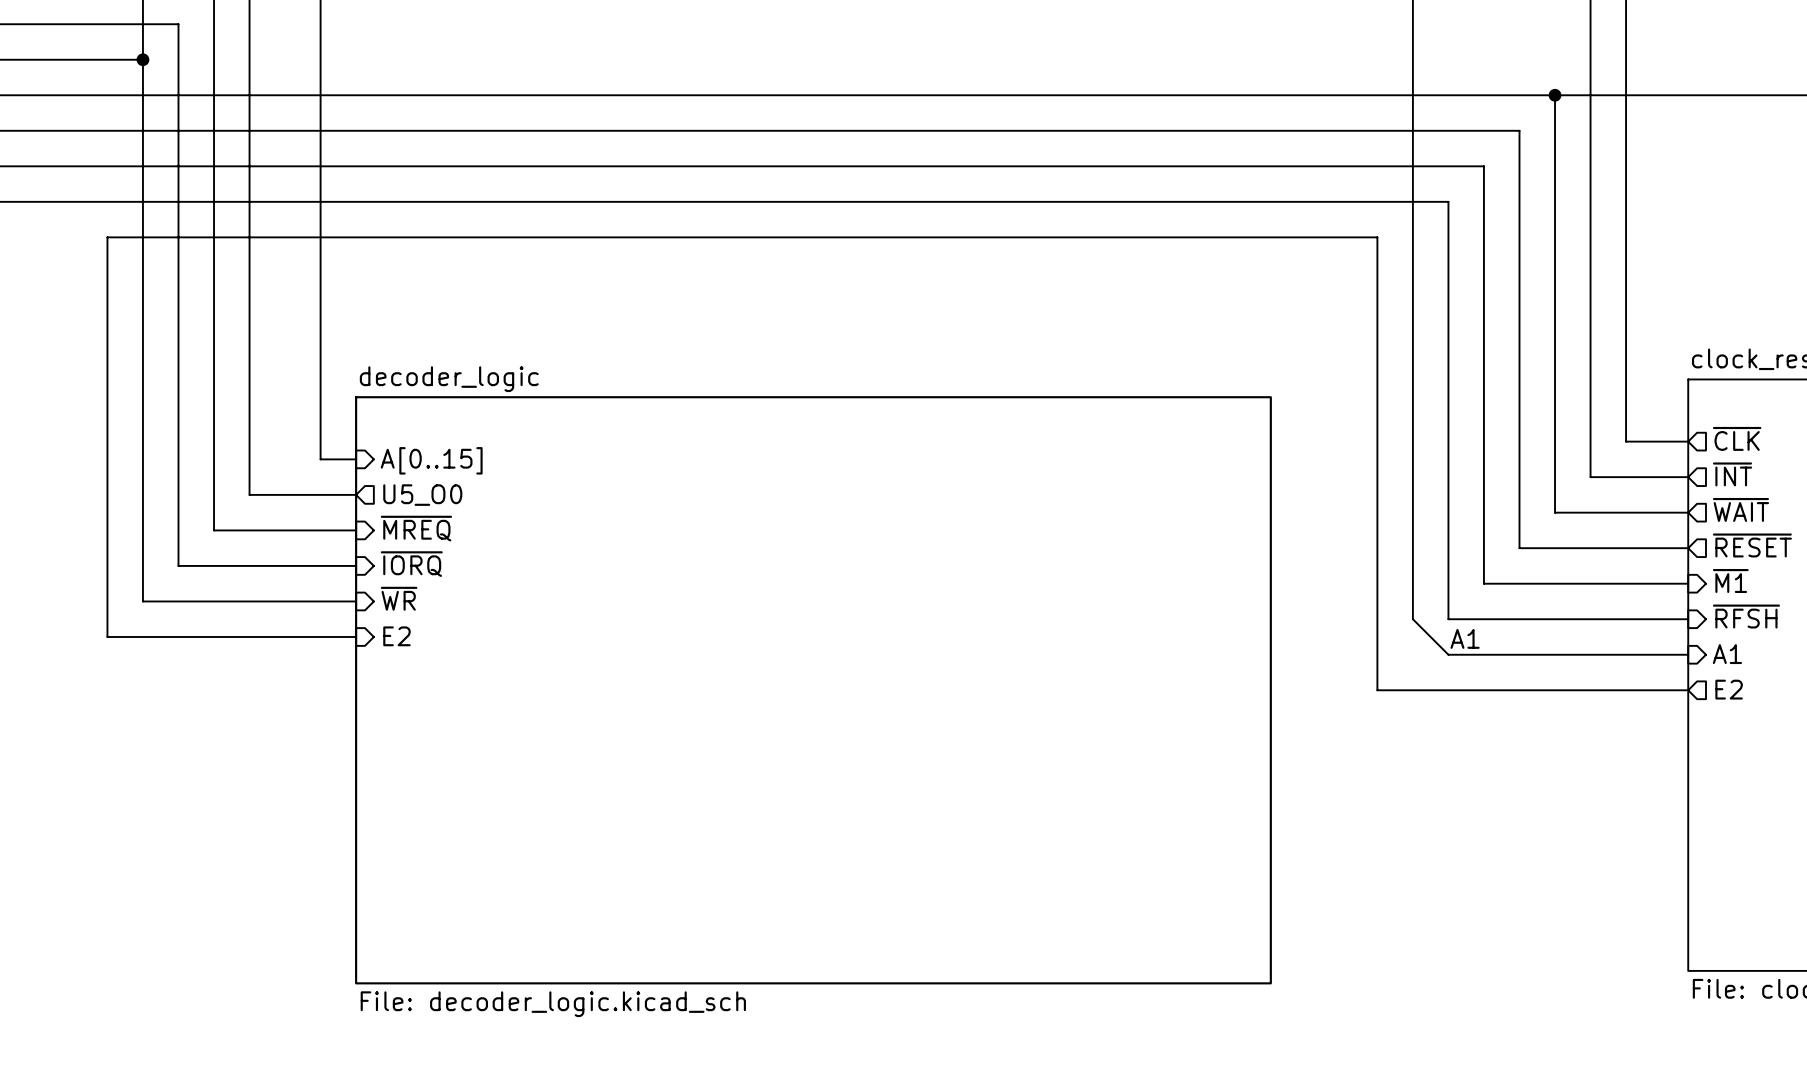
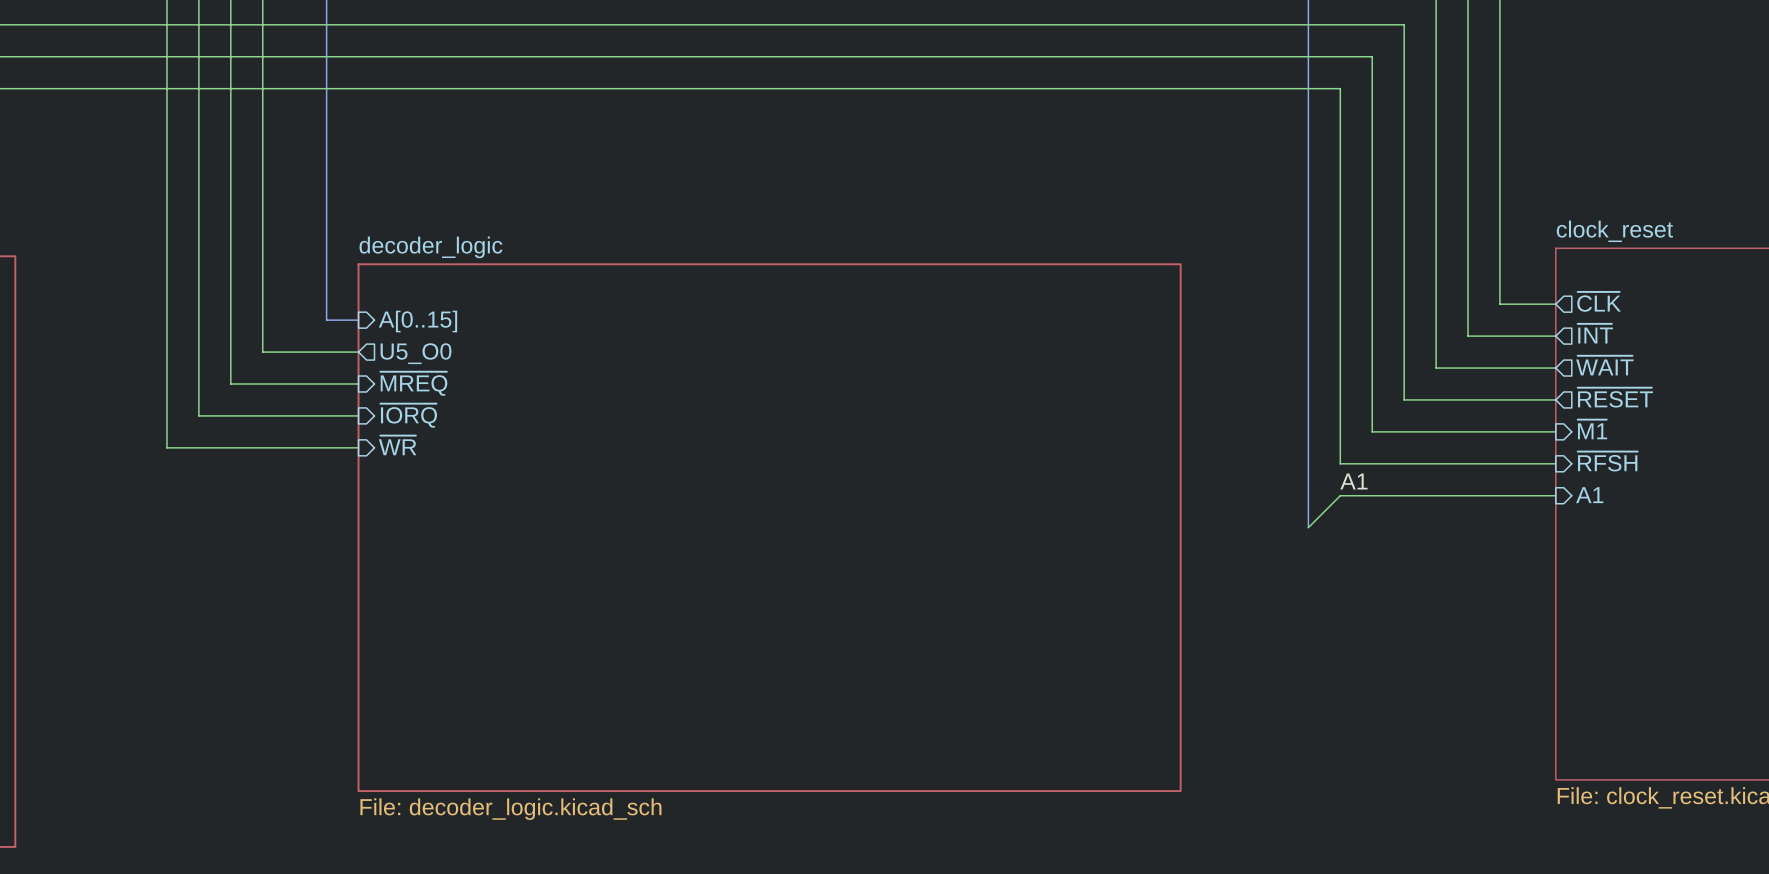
wire: (1412, 619) (1448, 654) -> (1308, 527) (1340, 495)
bus: none -> (1308, 463) (1308, 527)
sheet pin: E2 (396, 636) -> none
wire: (356, 637) (107, 637) (107, 237) (1377, 237) (1377, 690) (1688, 690) -> none
sheet pin: E2 (1729, 689) -> none

